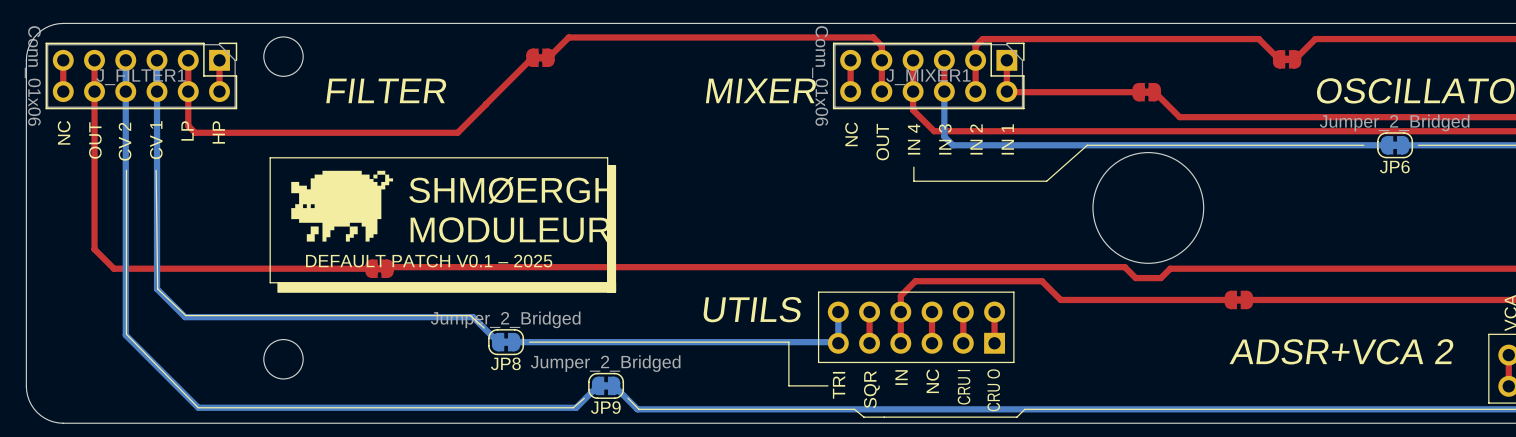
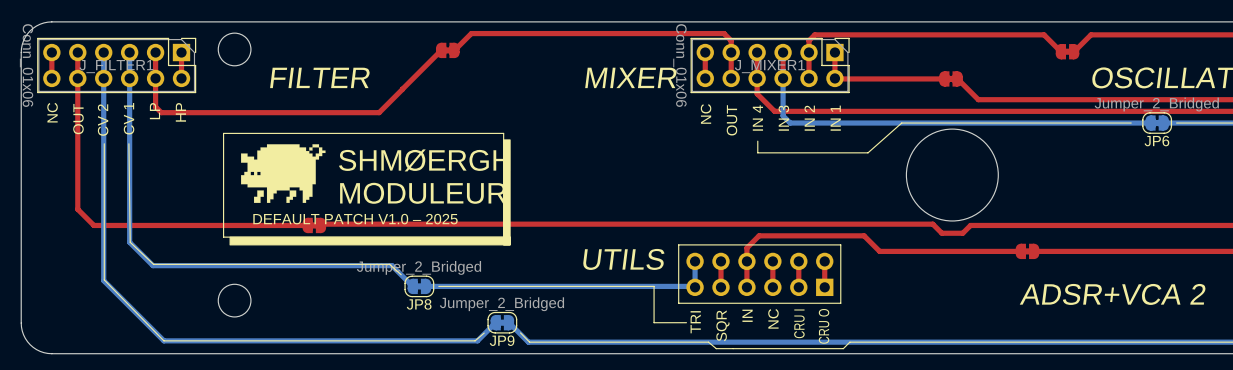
text: DEFAULT PATCH V0.1 – 2025 (429, 261) -> DEFAULT PATCH V1.0 – 2025 (355, 219)

